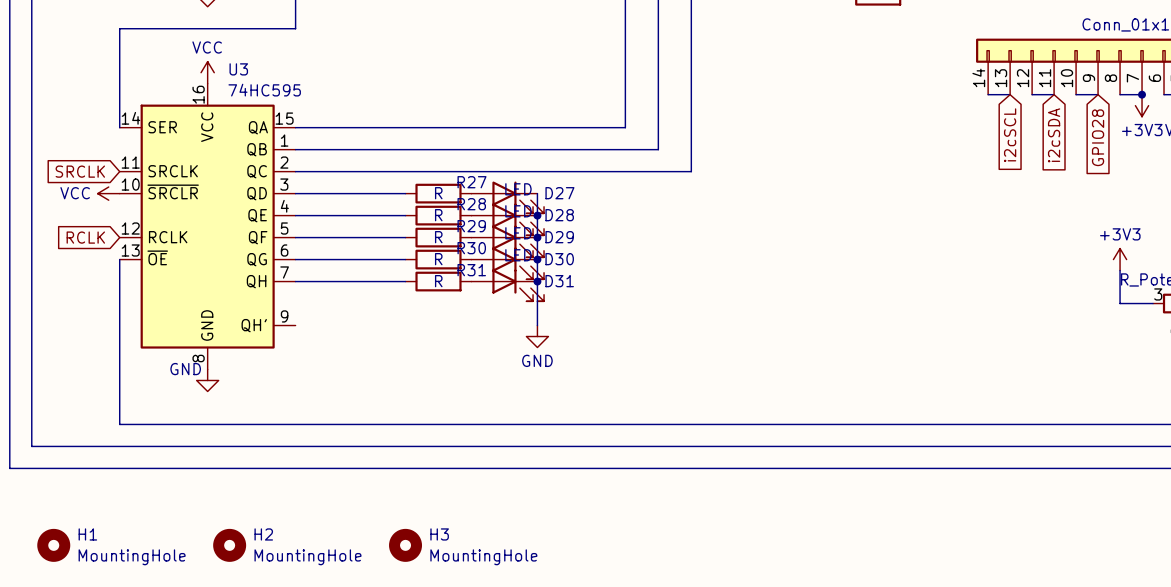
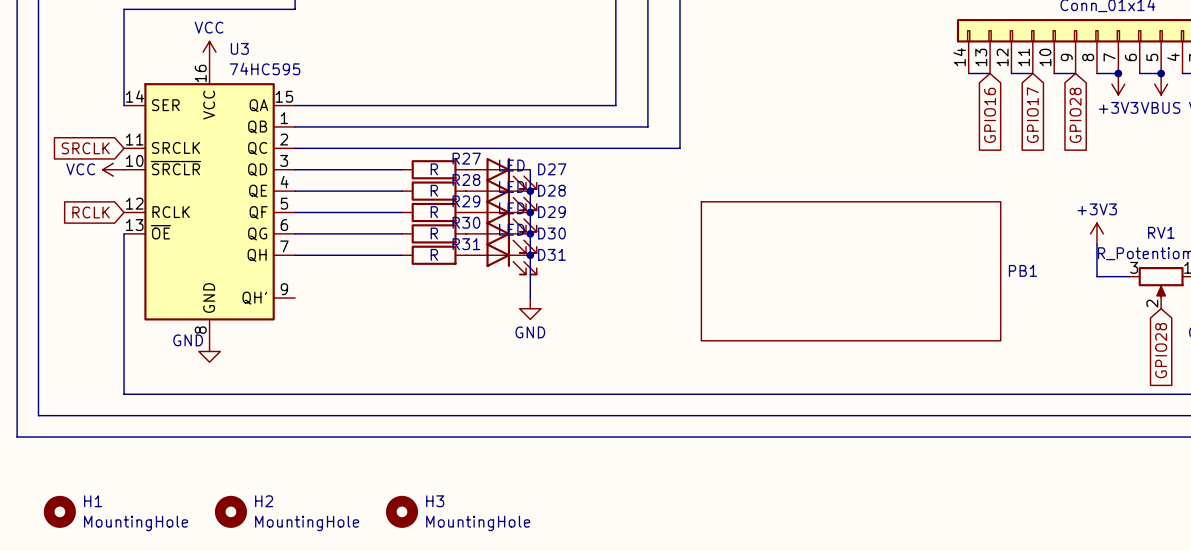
global label: i2cSCL (1010, 135) -> GPIO16 (990, 115)
global label: i2cSDA (1054, 135) -> GPIO17 (1032, 115)
PB1: none -> (851, 271)

